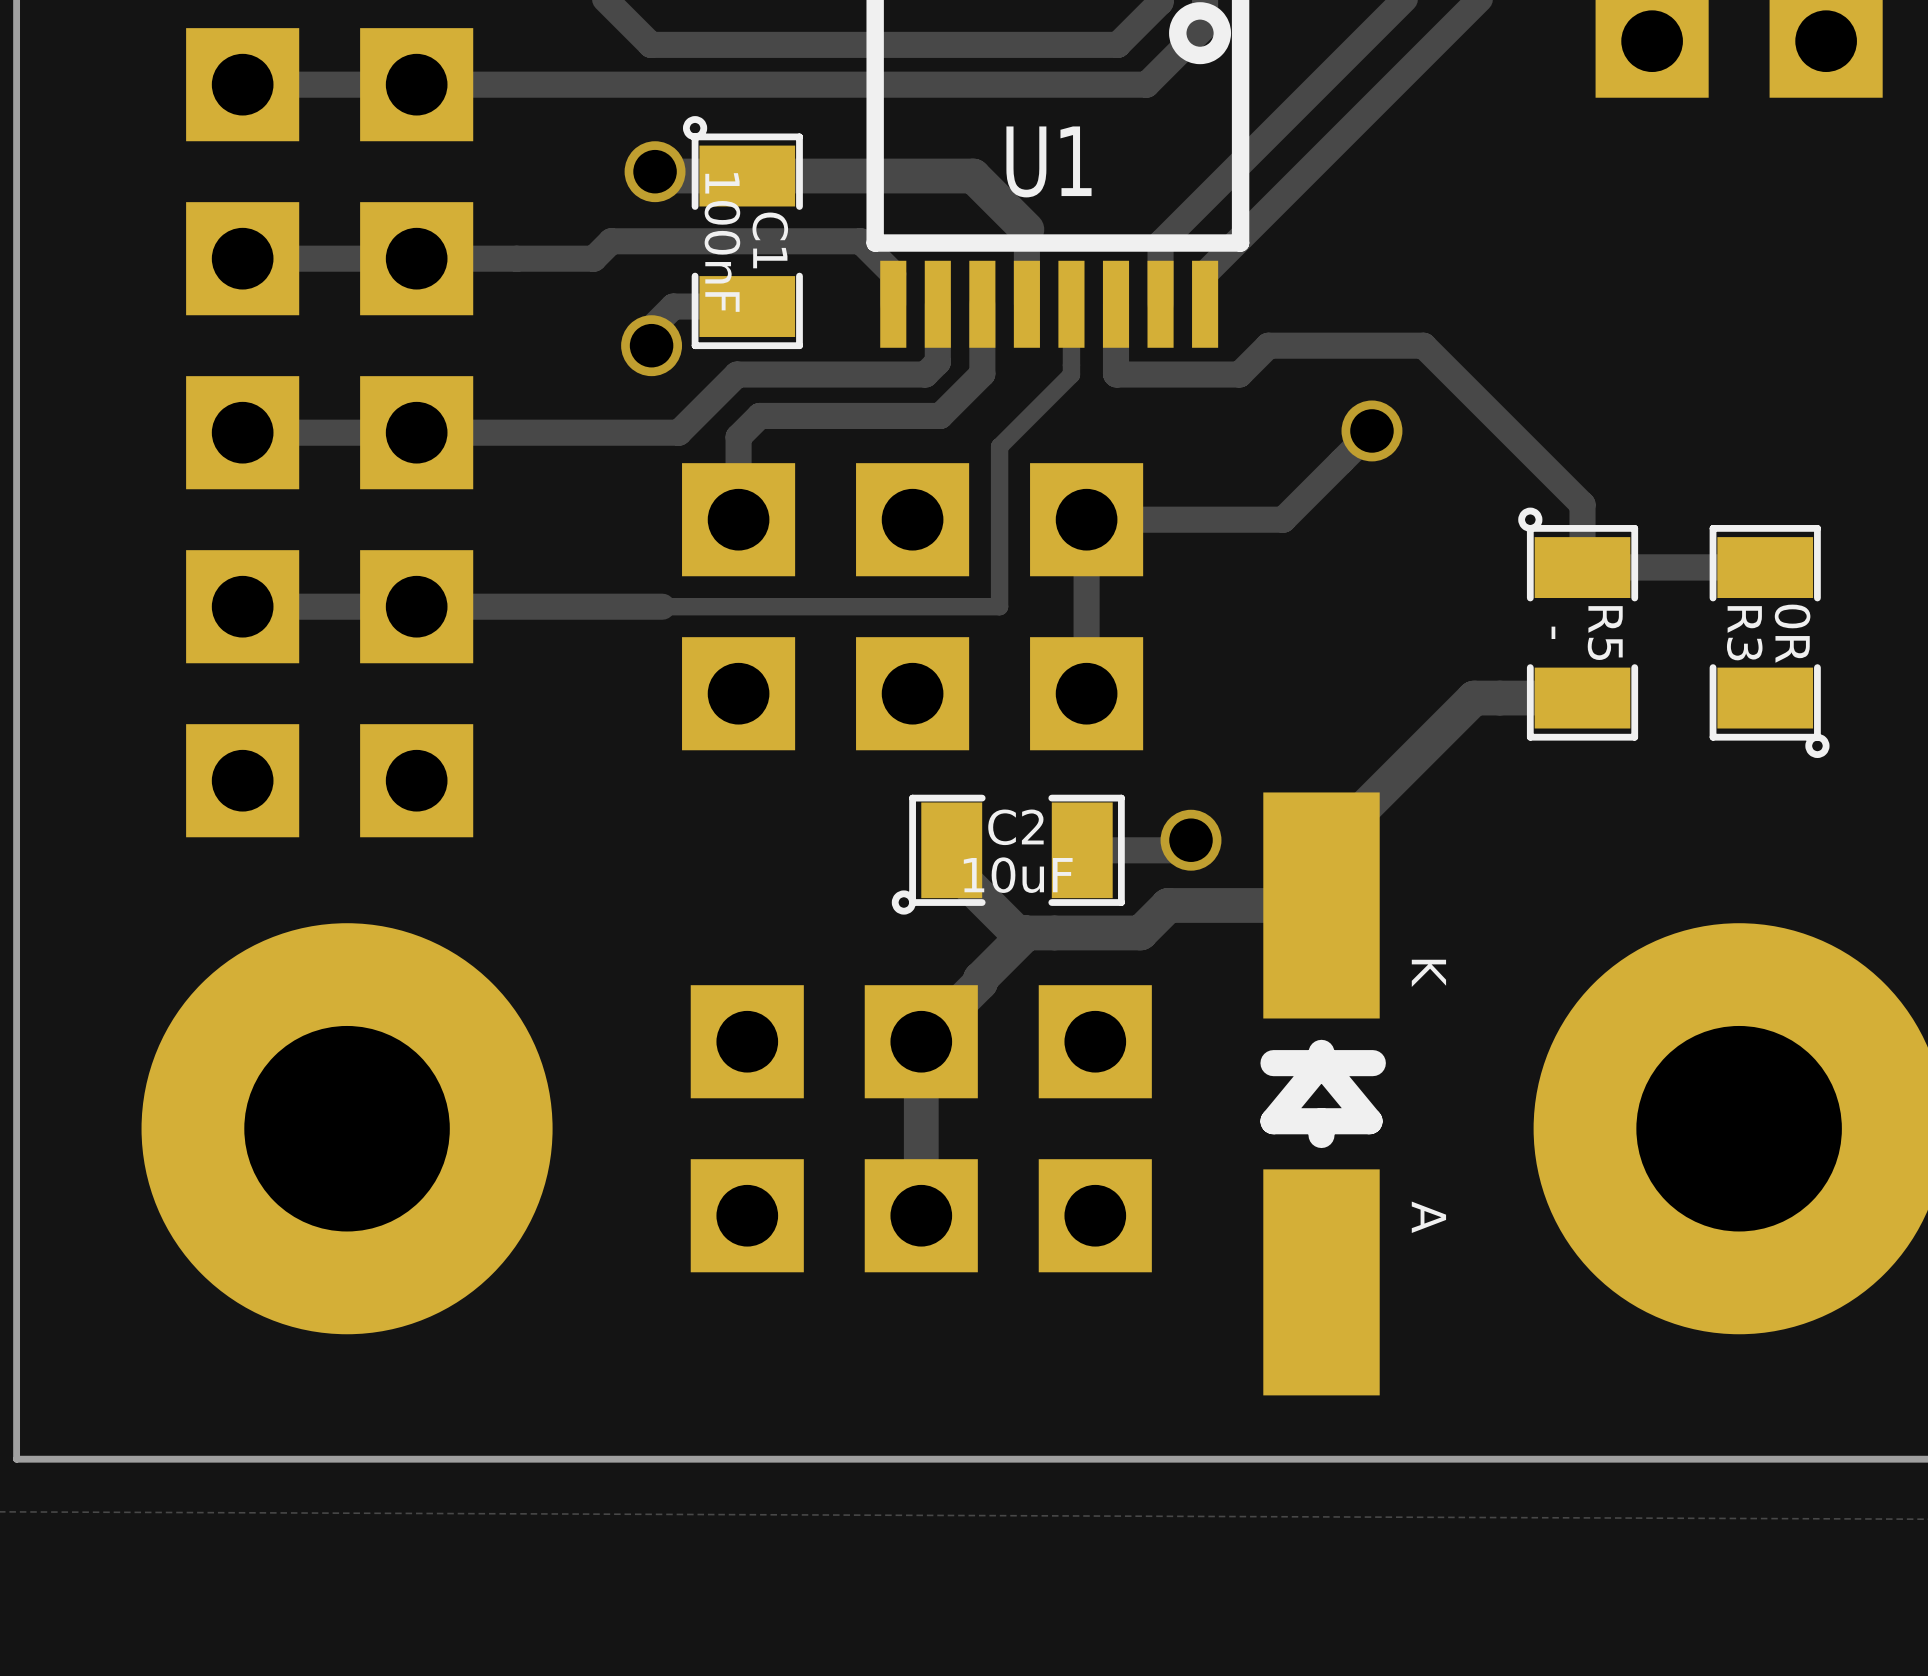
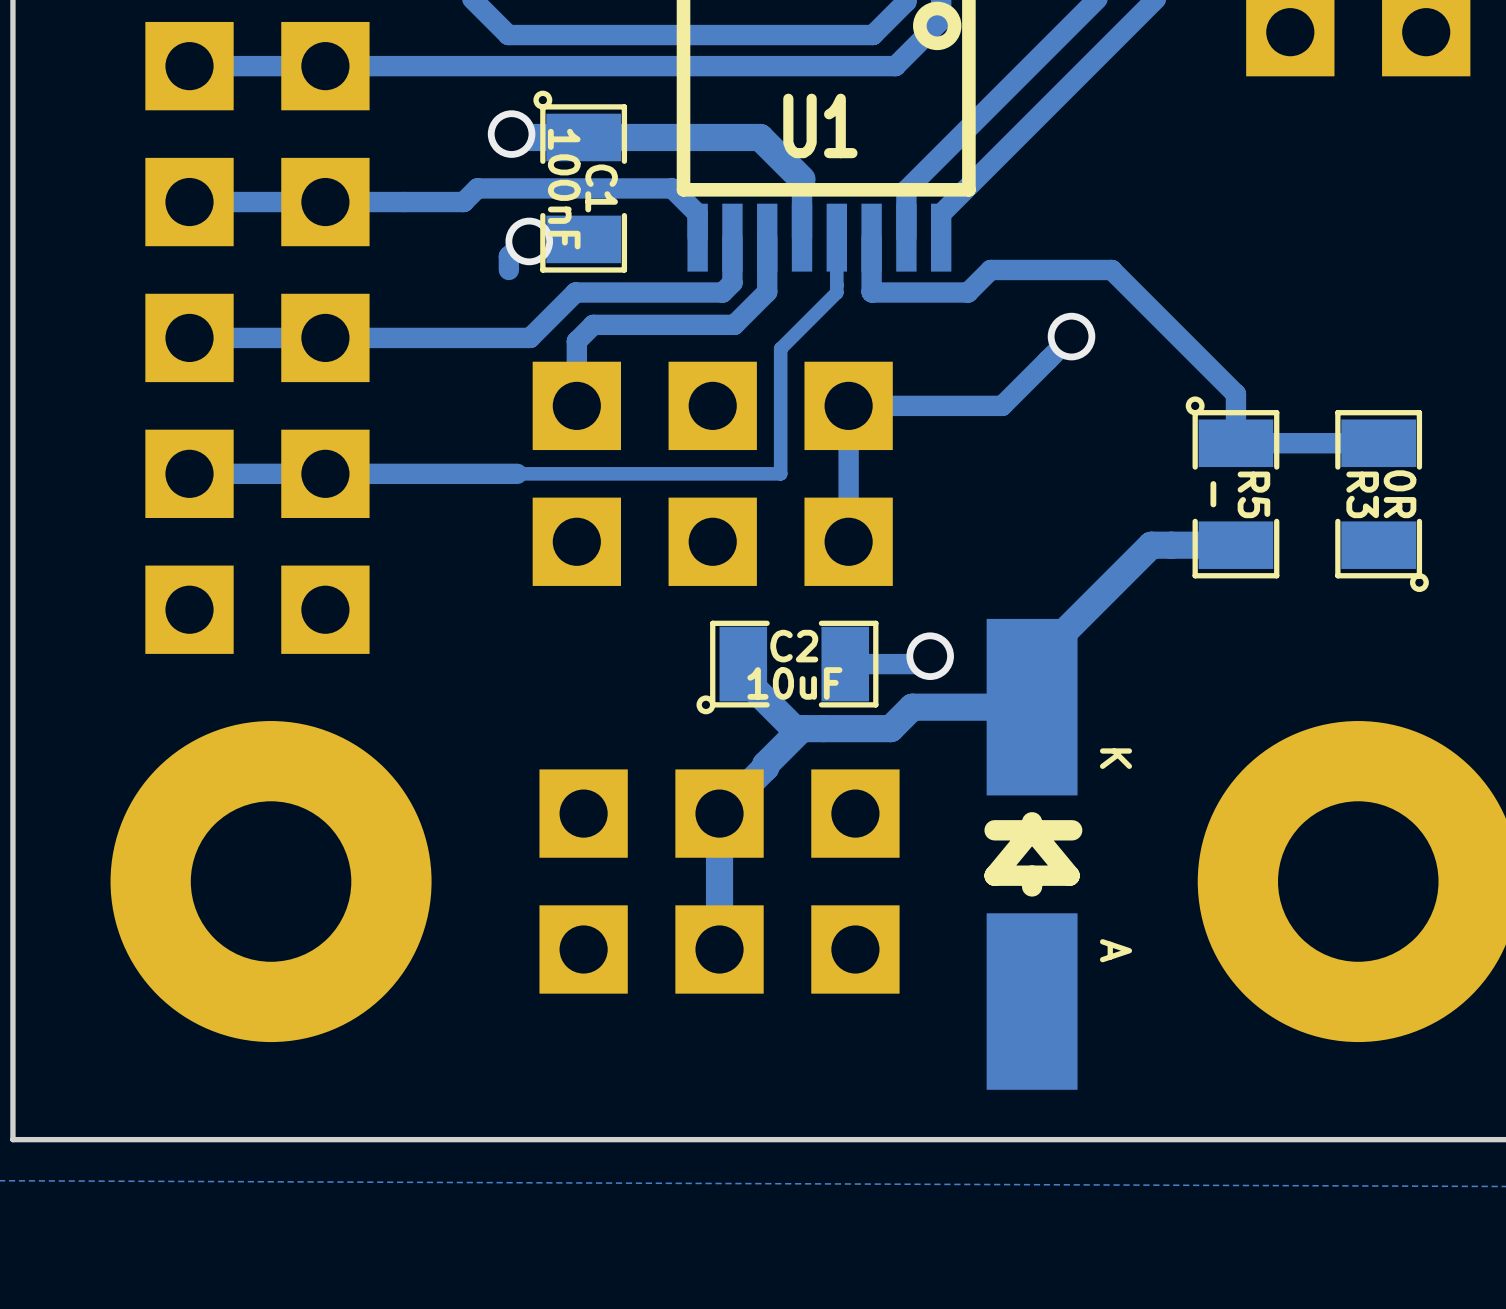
via position: (651, 345) -> (529, 241)

